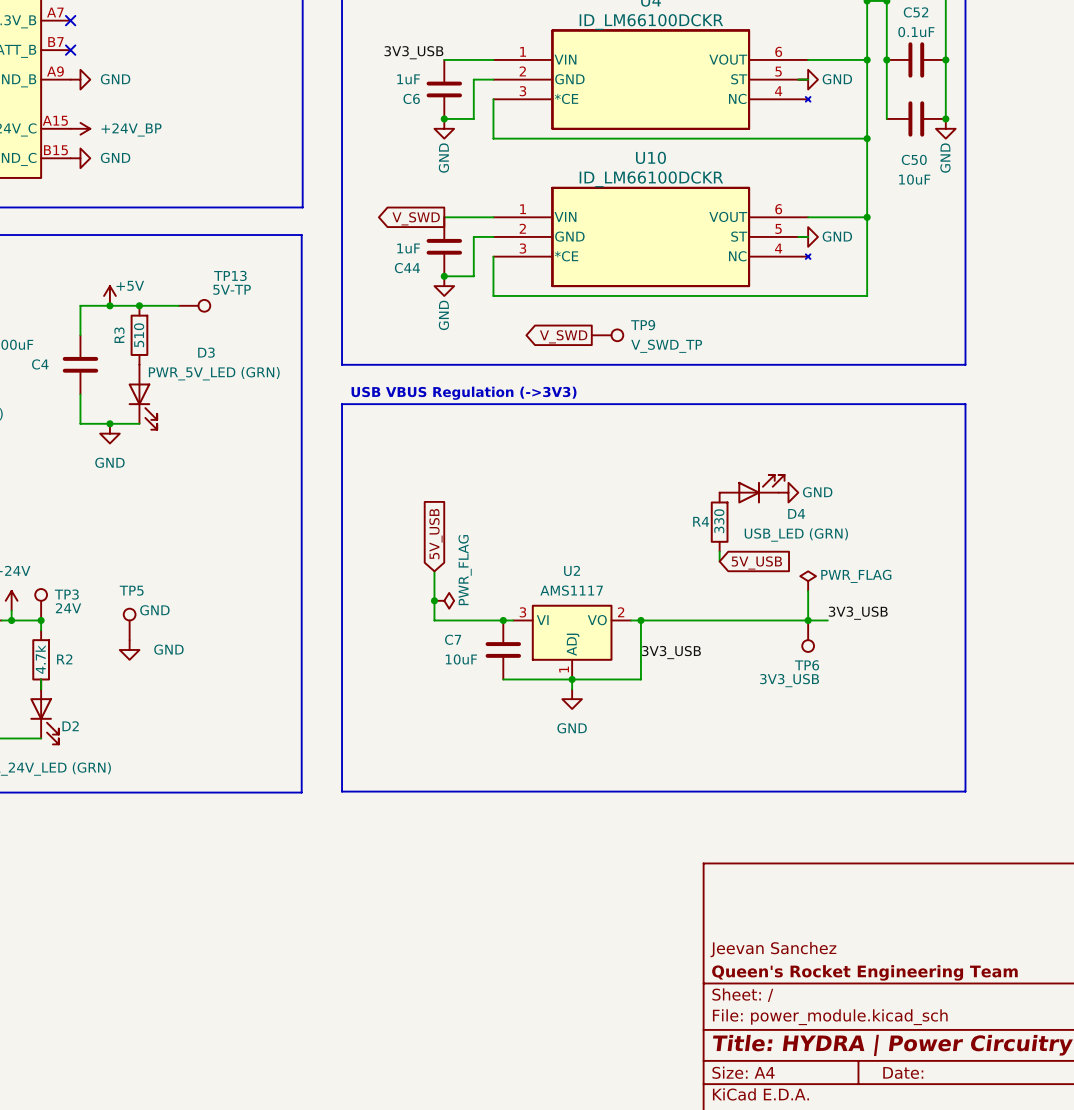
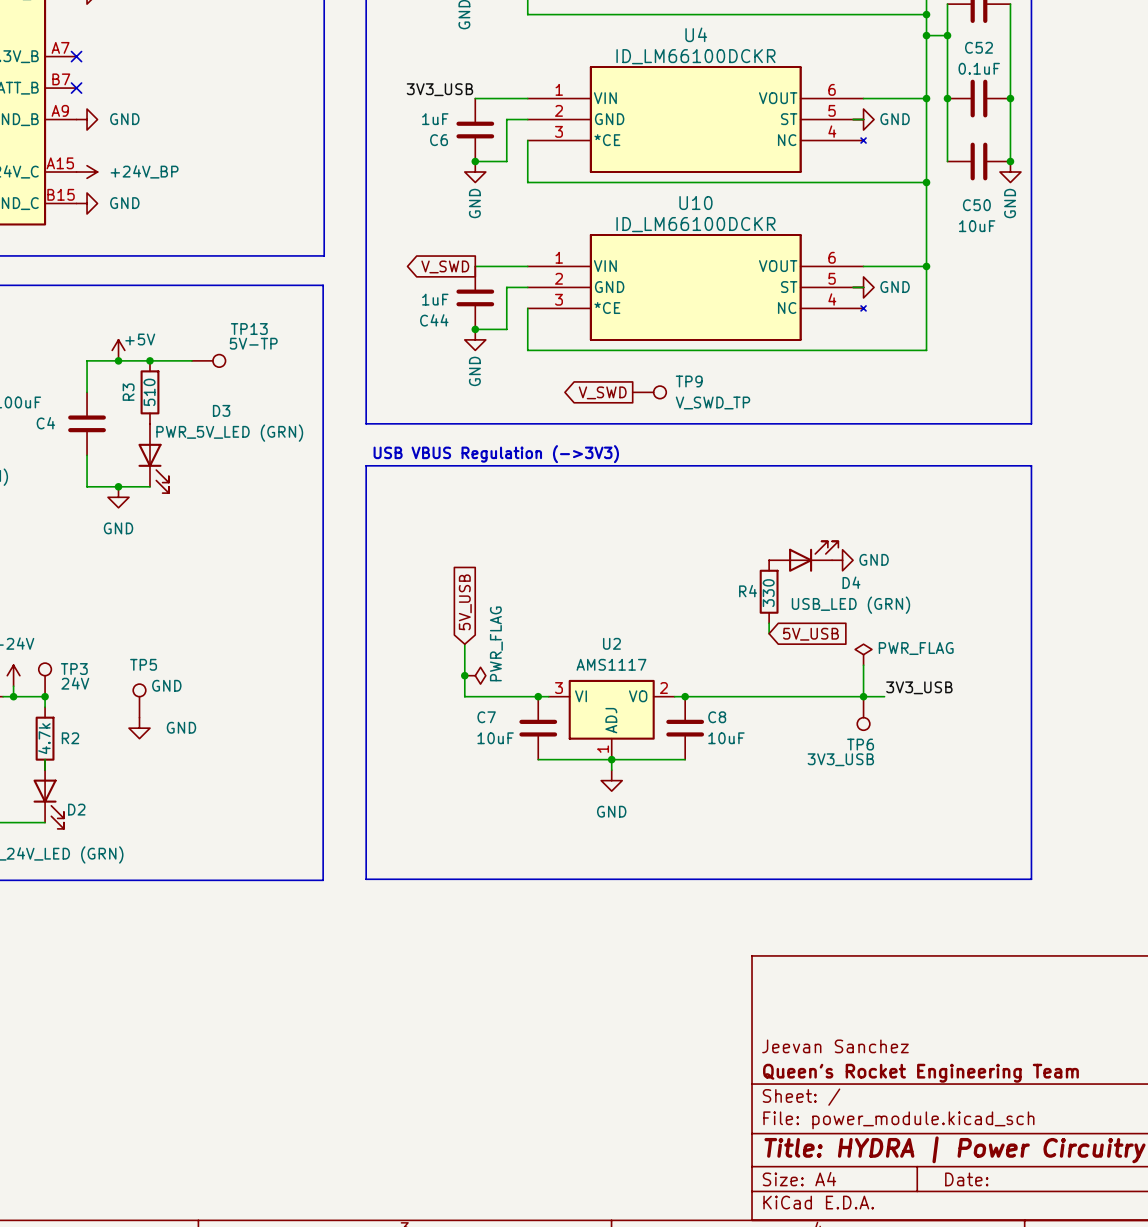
C8: none -> 10uF (685, 728)
label: 3V3_USB (671, 652) -> none

